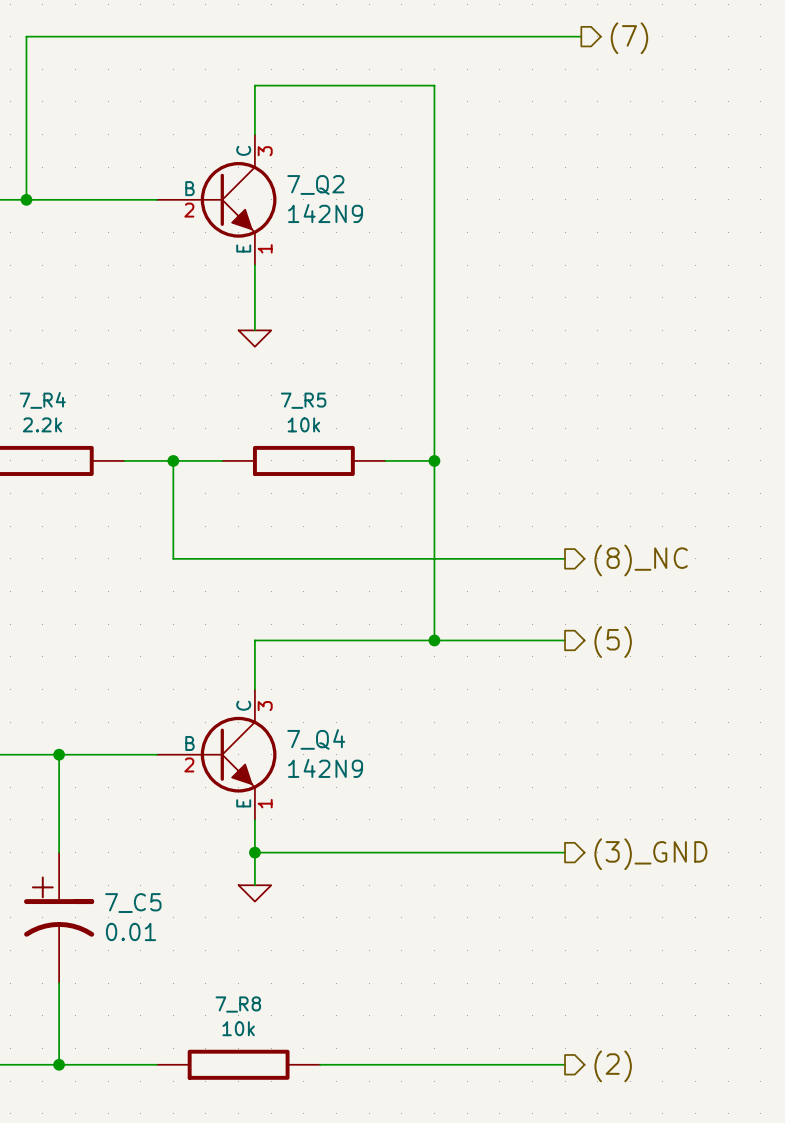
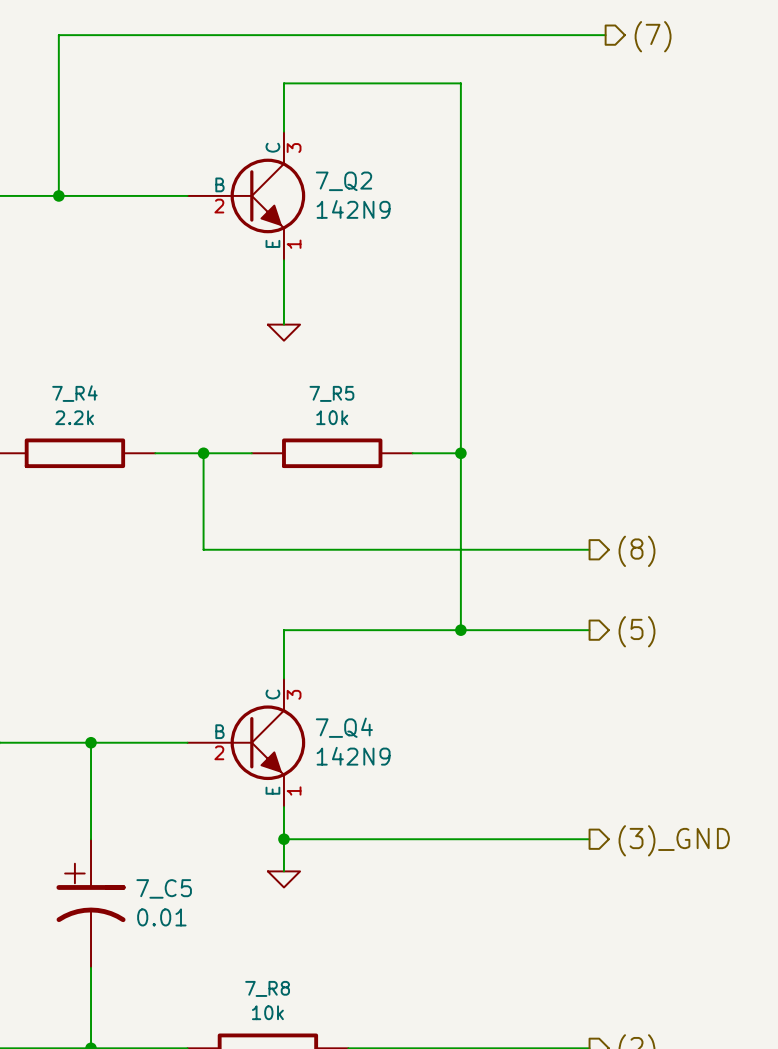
hierarchical label: (8)_NC (641, 560) -> (8) (636, 551)

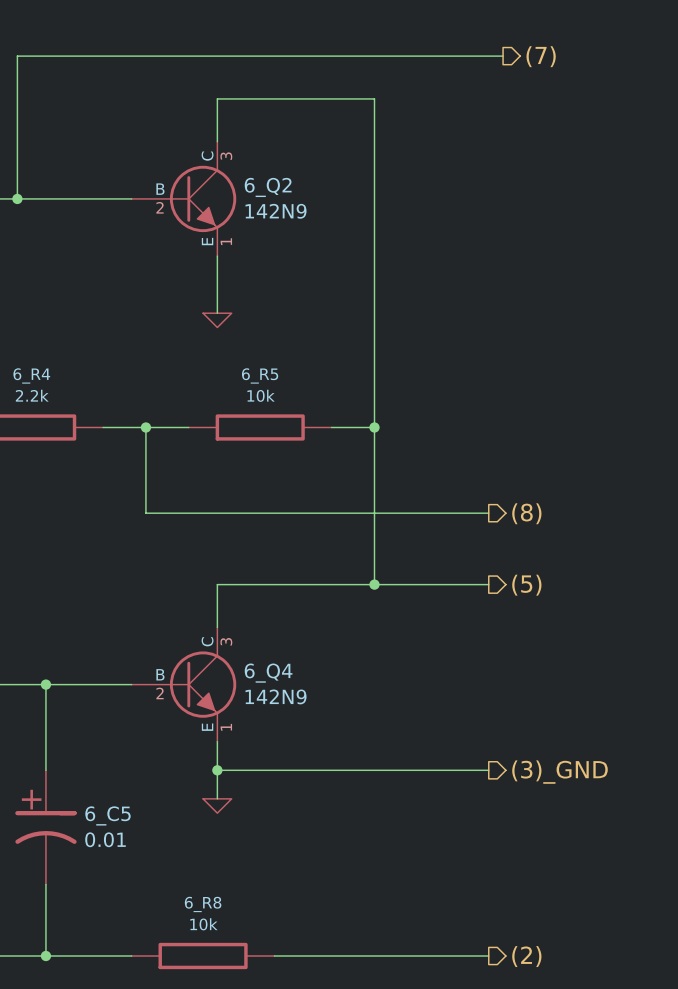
7_Q2 name: 7_Q2 (344, 181) -> 6_Q2 (268, 187)
7_R4 name: 7_R4 (74, 393) -> 6_R4 (31, 375)
7_R5 name: 7_R5 (331, 393) -> 6_R5 (260, 375)
7_Q4 name: 7_Q4 (344, 727) -> 6_Q4 (268, 673)
7_C5 name: 7_C5 (164, 888) -> 6_C5 (107, 815)
7_R8 name: 7_R8 (267, 988) -> 6_R8 (203, 904)

